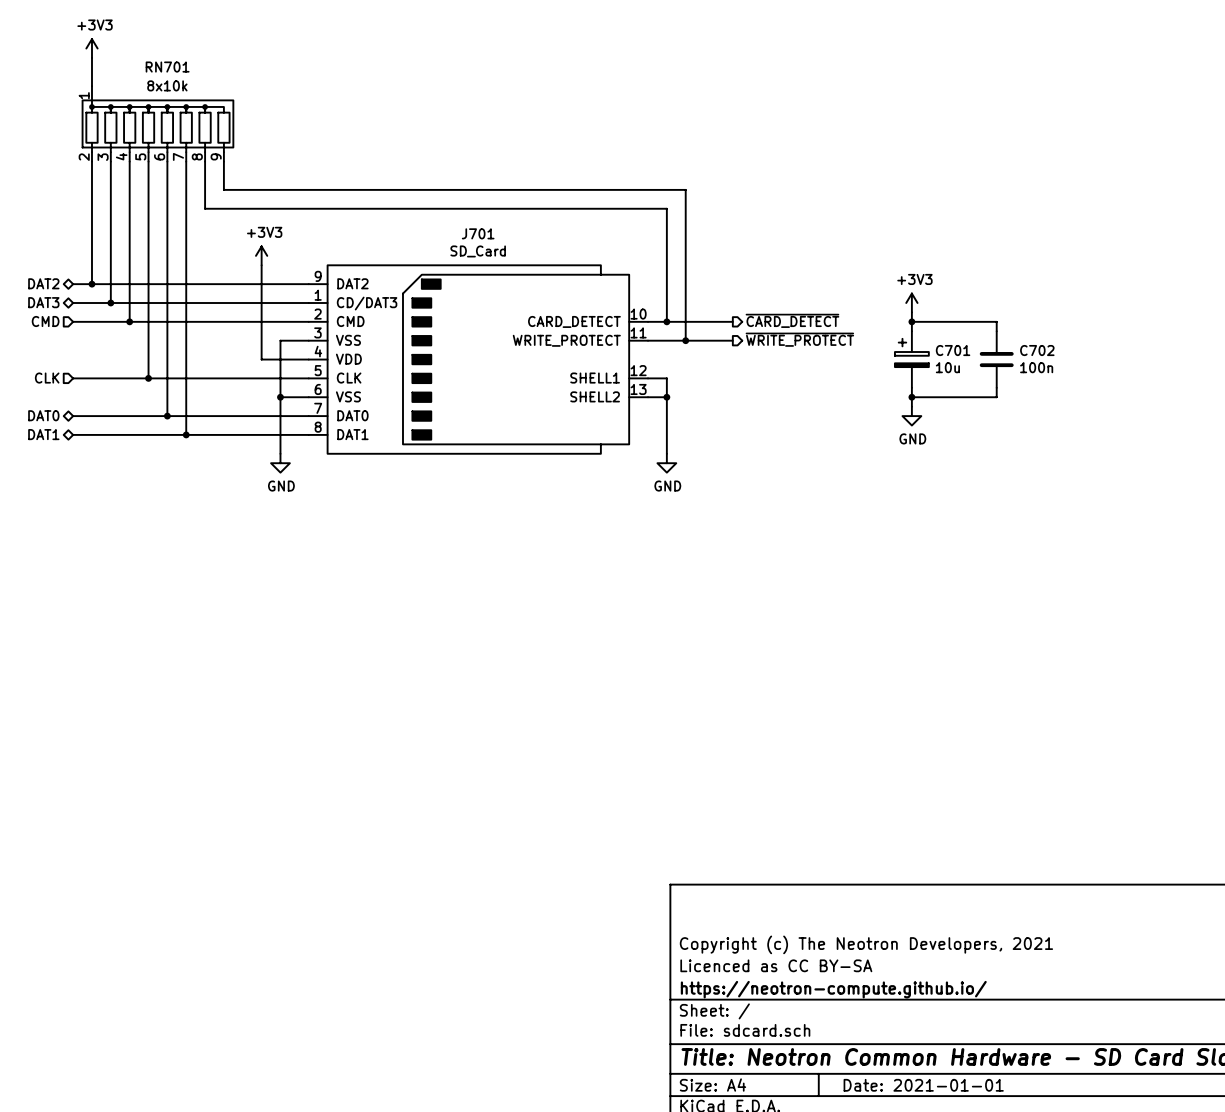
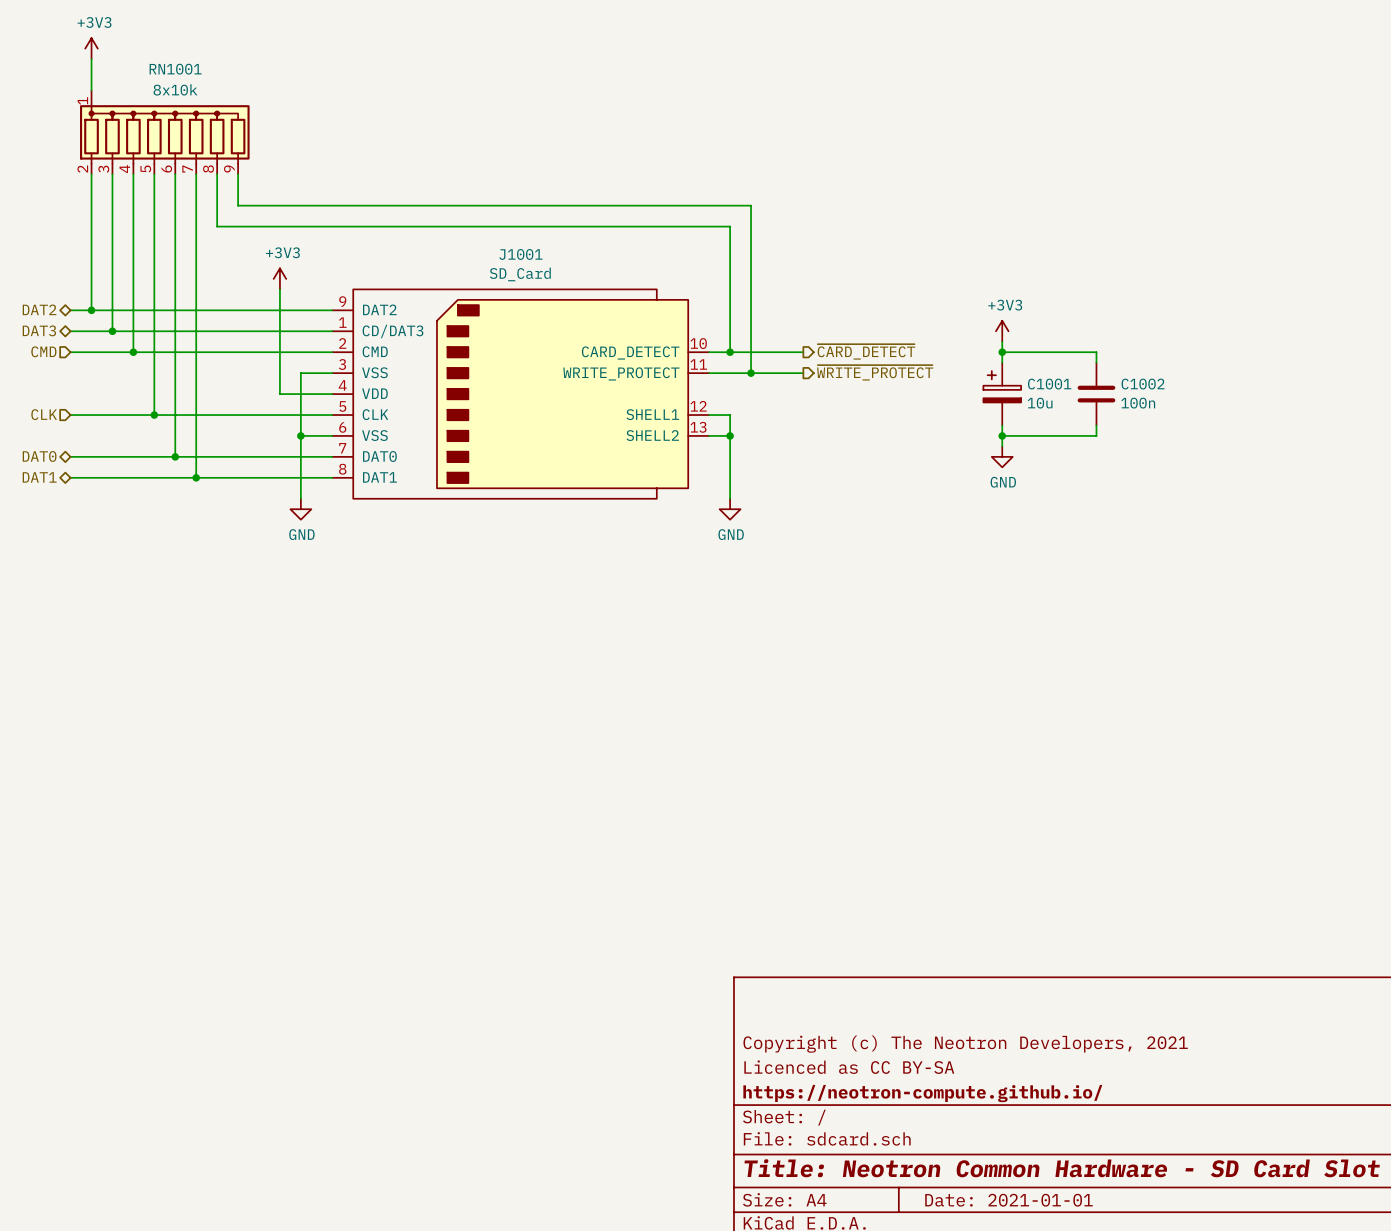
RN701 name: RN701 (167, 67) -> RN1001 (175, 69)
J701 name: J701 (478, 233) -> J1001 (520, 254)
C701 name: C701 (953, 350) -> C1001 (1049, 384)
C702 name: C702 (1037, 350) -> C1002 (1143, 384)

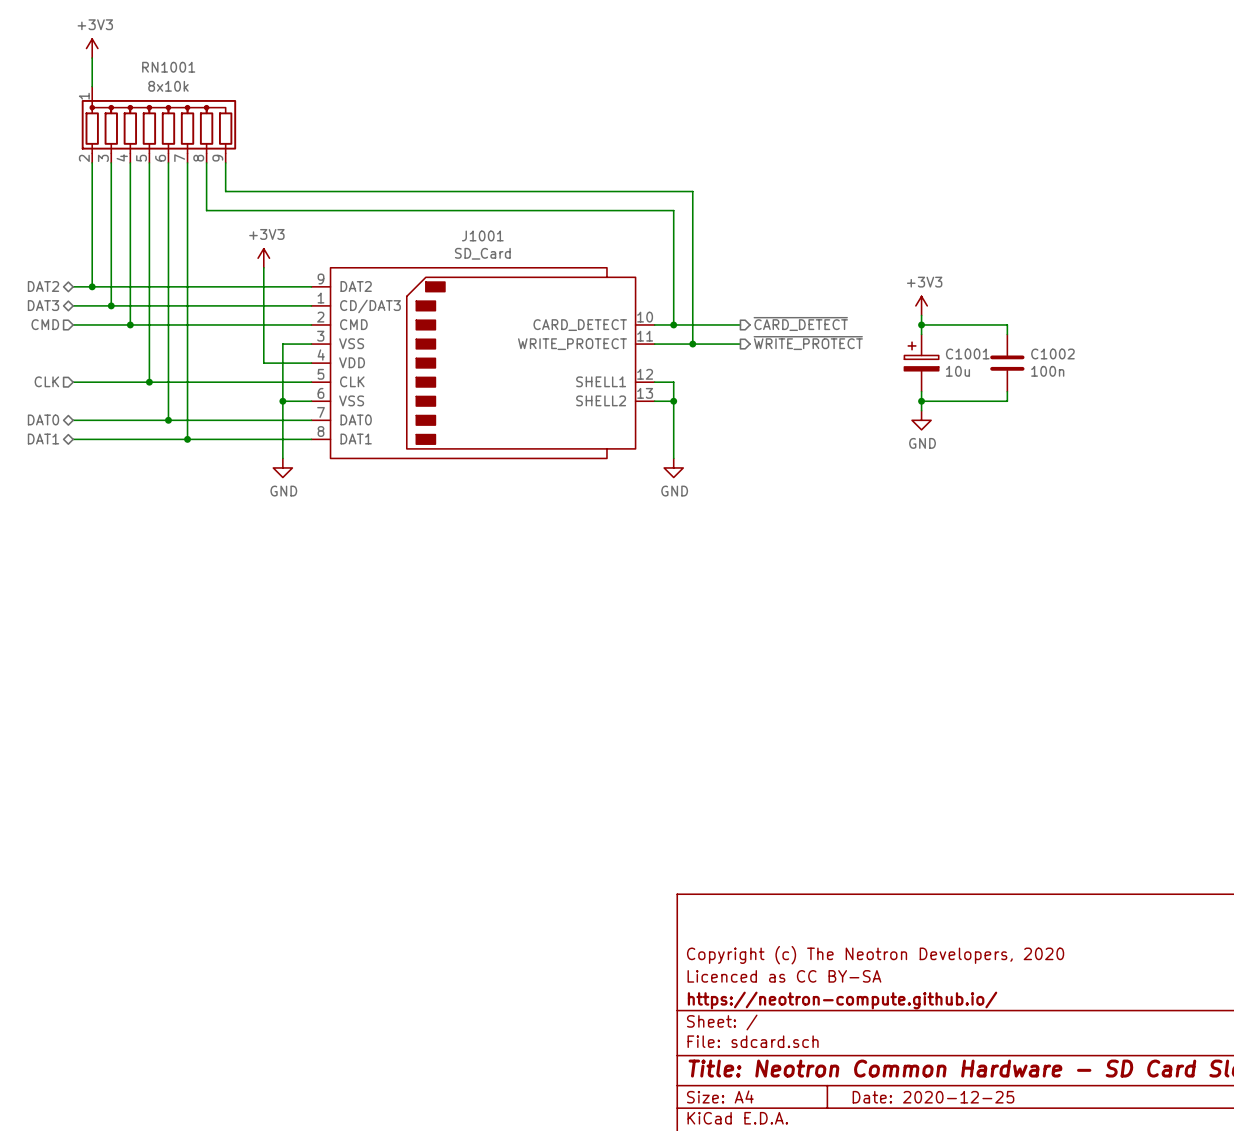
title block: Copyright (c) The Neotron Developers, 2021 (965, 1044) -> Copyright (c) The Neotron Developers, 2020 (875, 955)
title block: Date: 2021-01-01 (1009, 1200) -> Date: 2020-12-25 (933, 1097)

